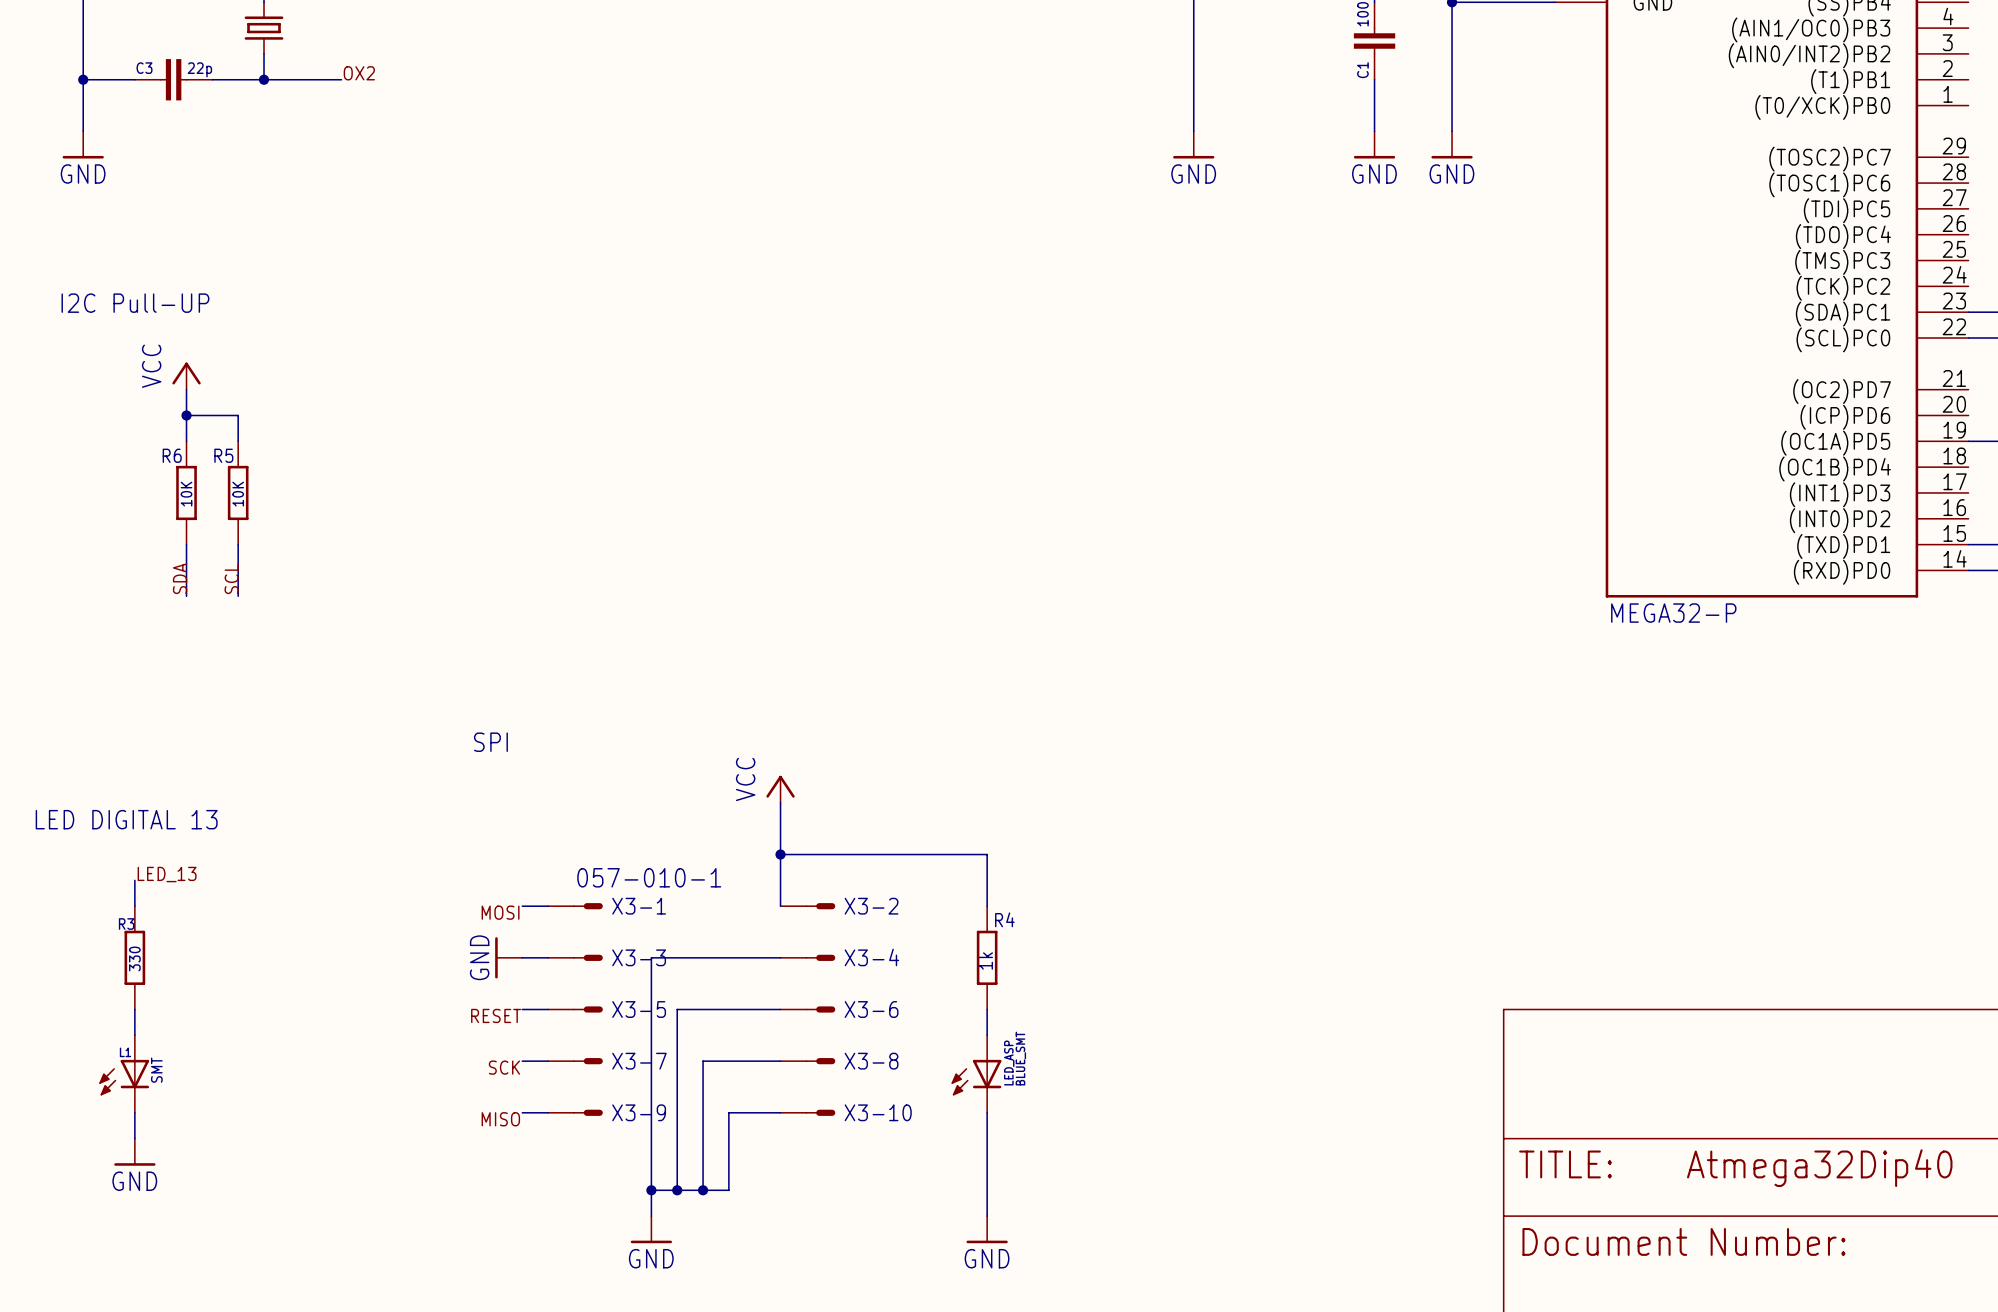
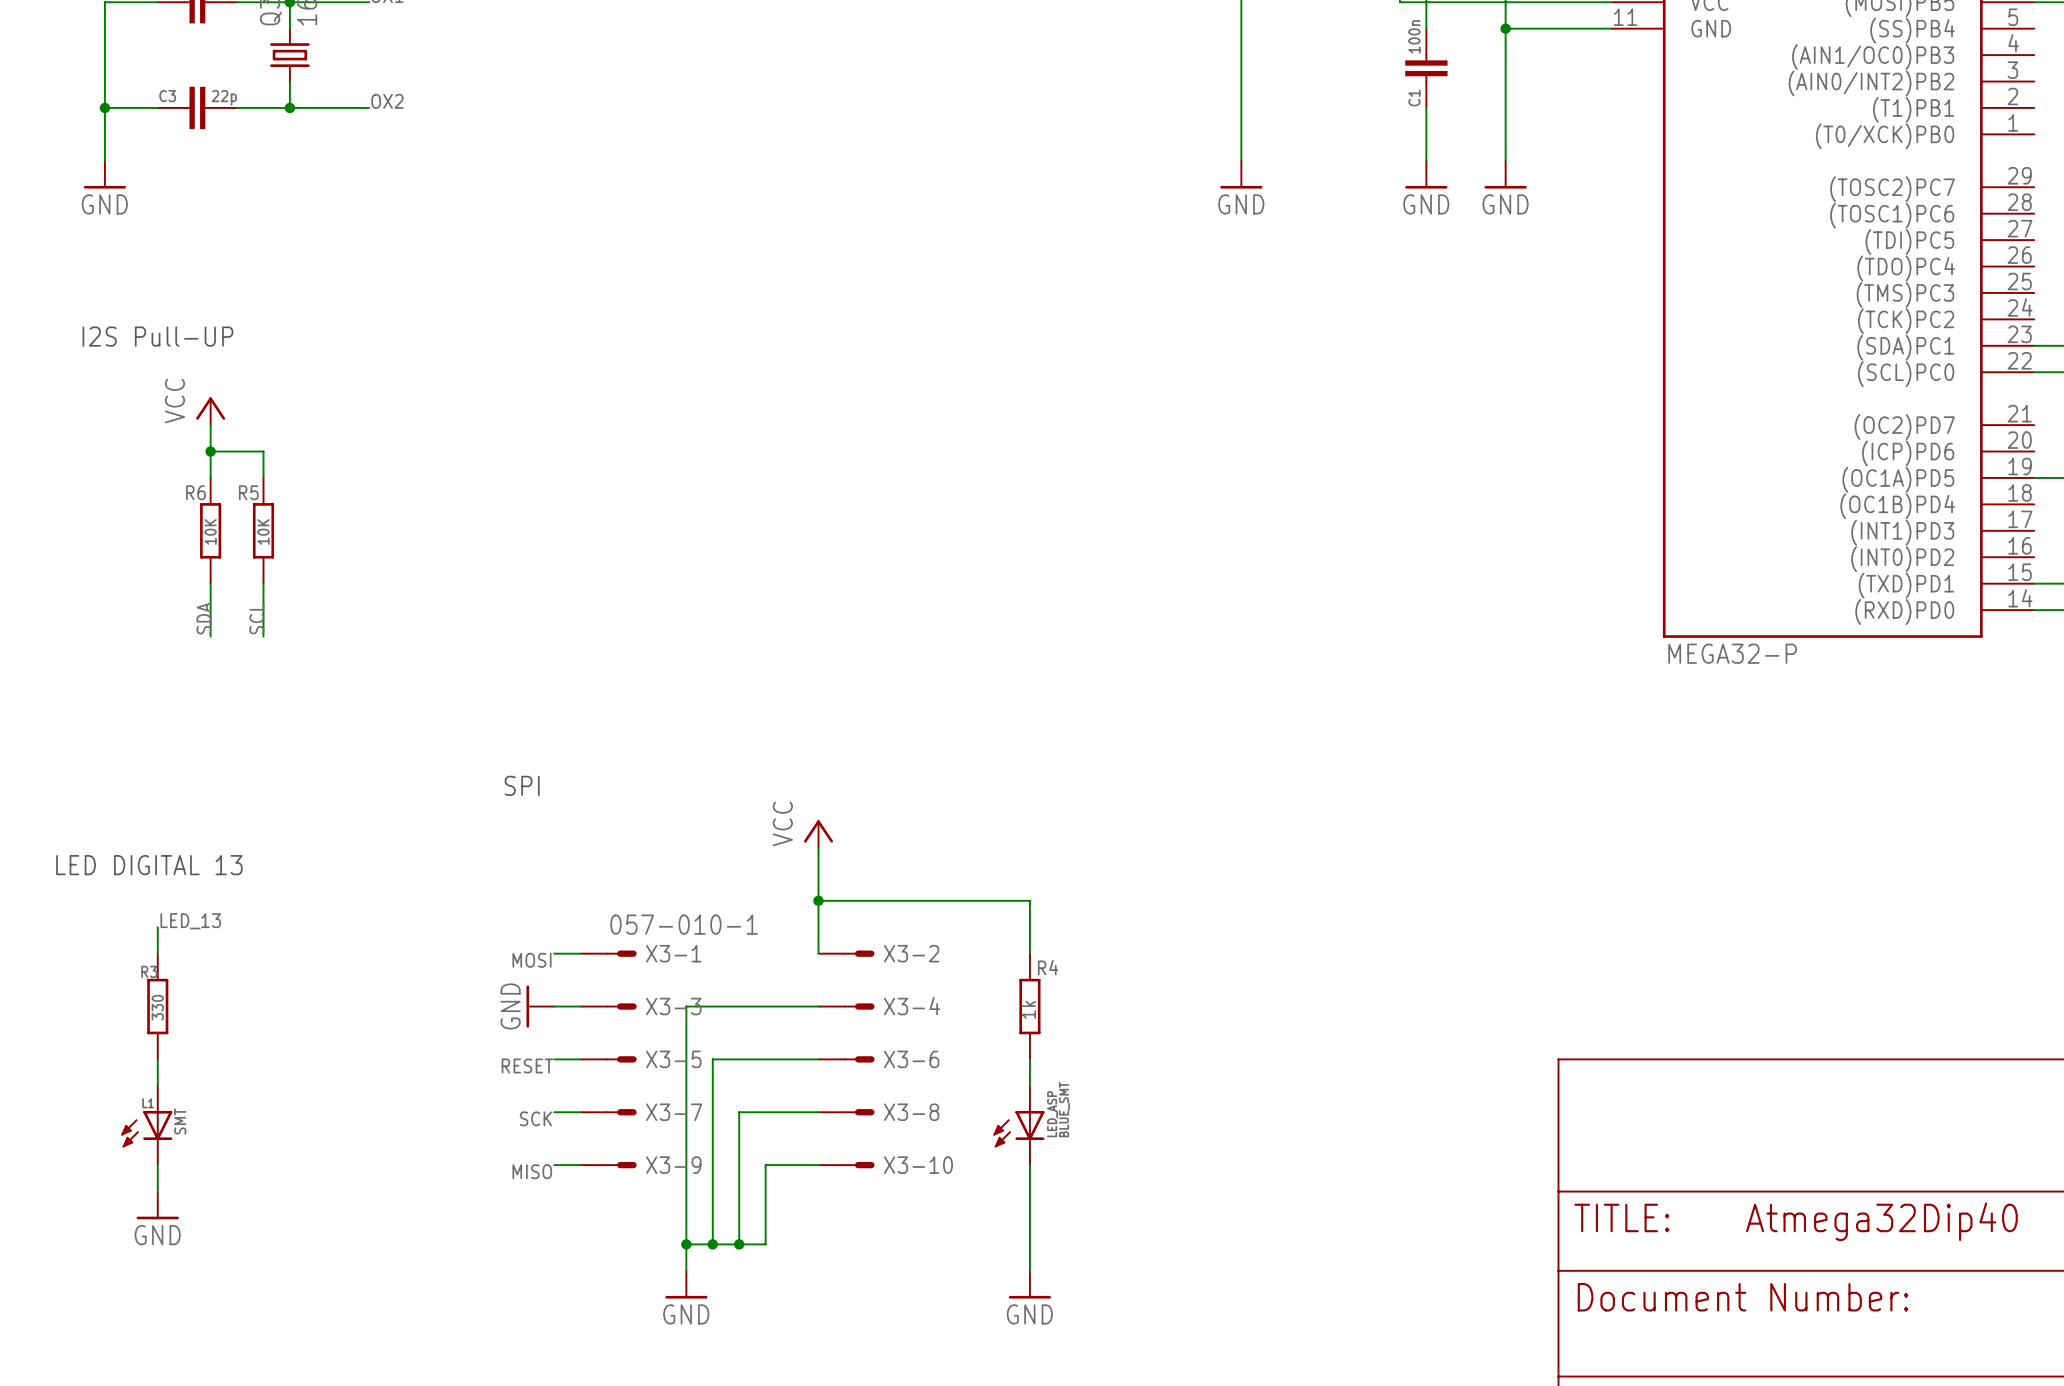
text: I2C Pull-UP (135, 303) -> I2S Pull-UP (157, 336)

